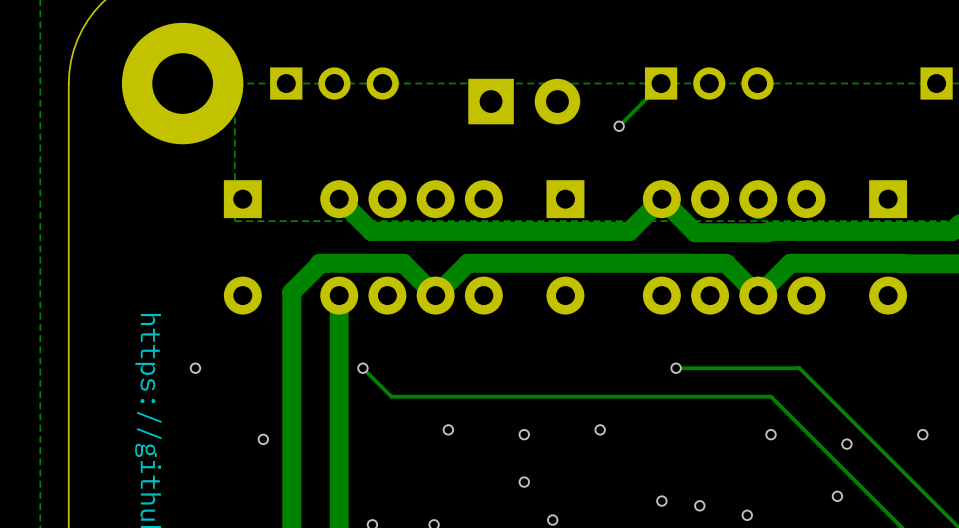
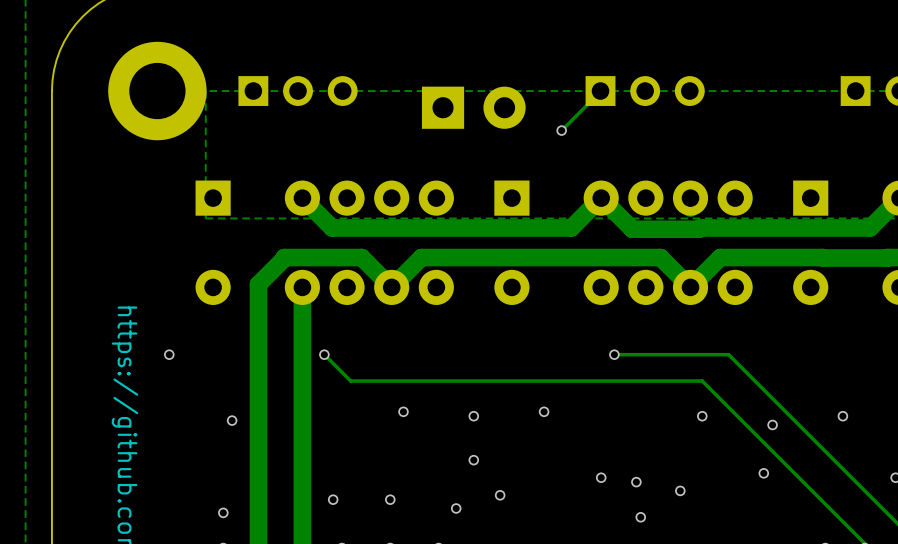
part footprint: [121, 22, 244, 145] -> [108, 41, 207, 141]

